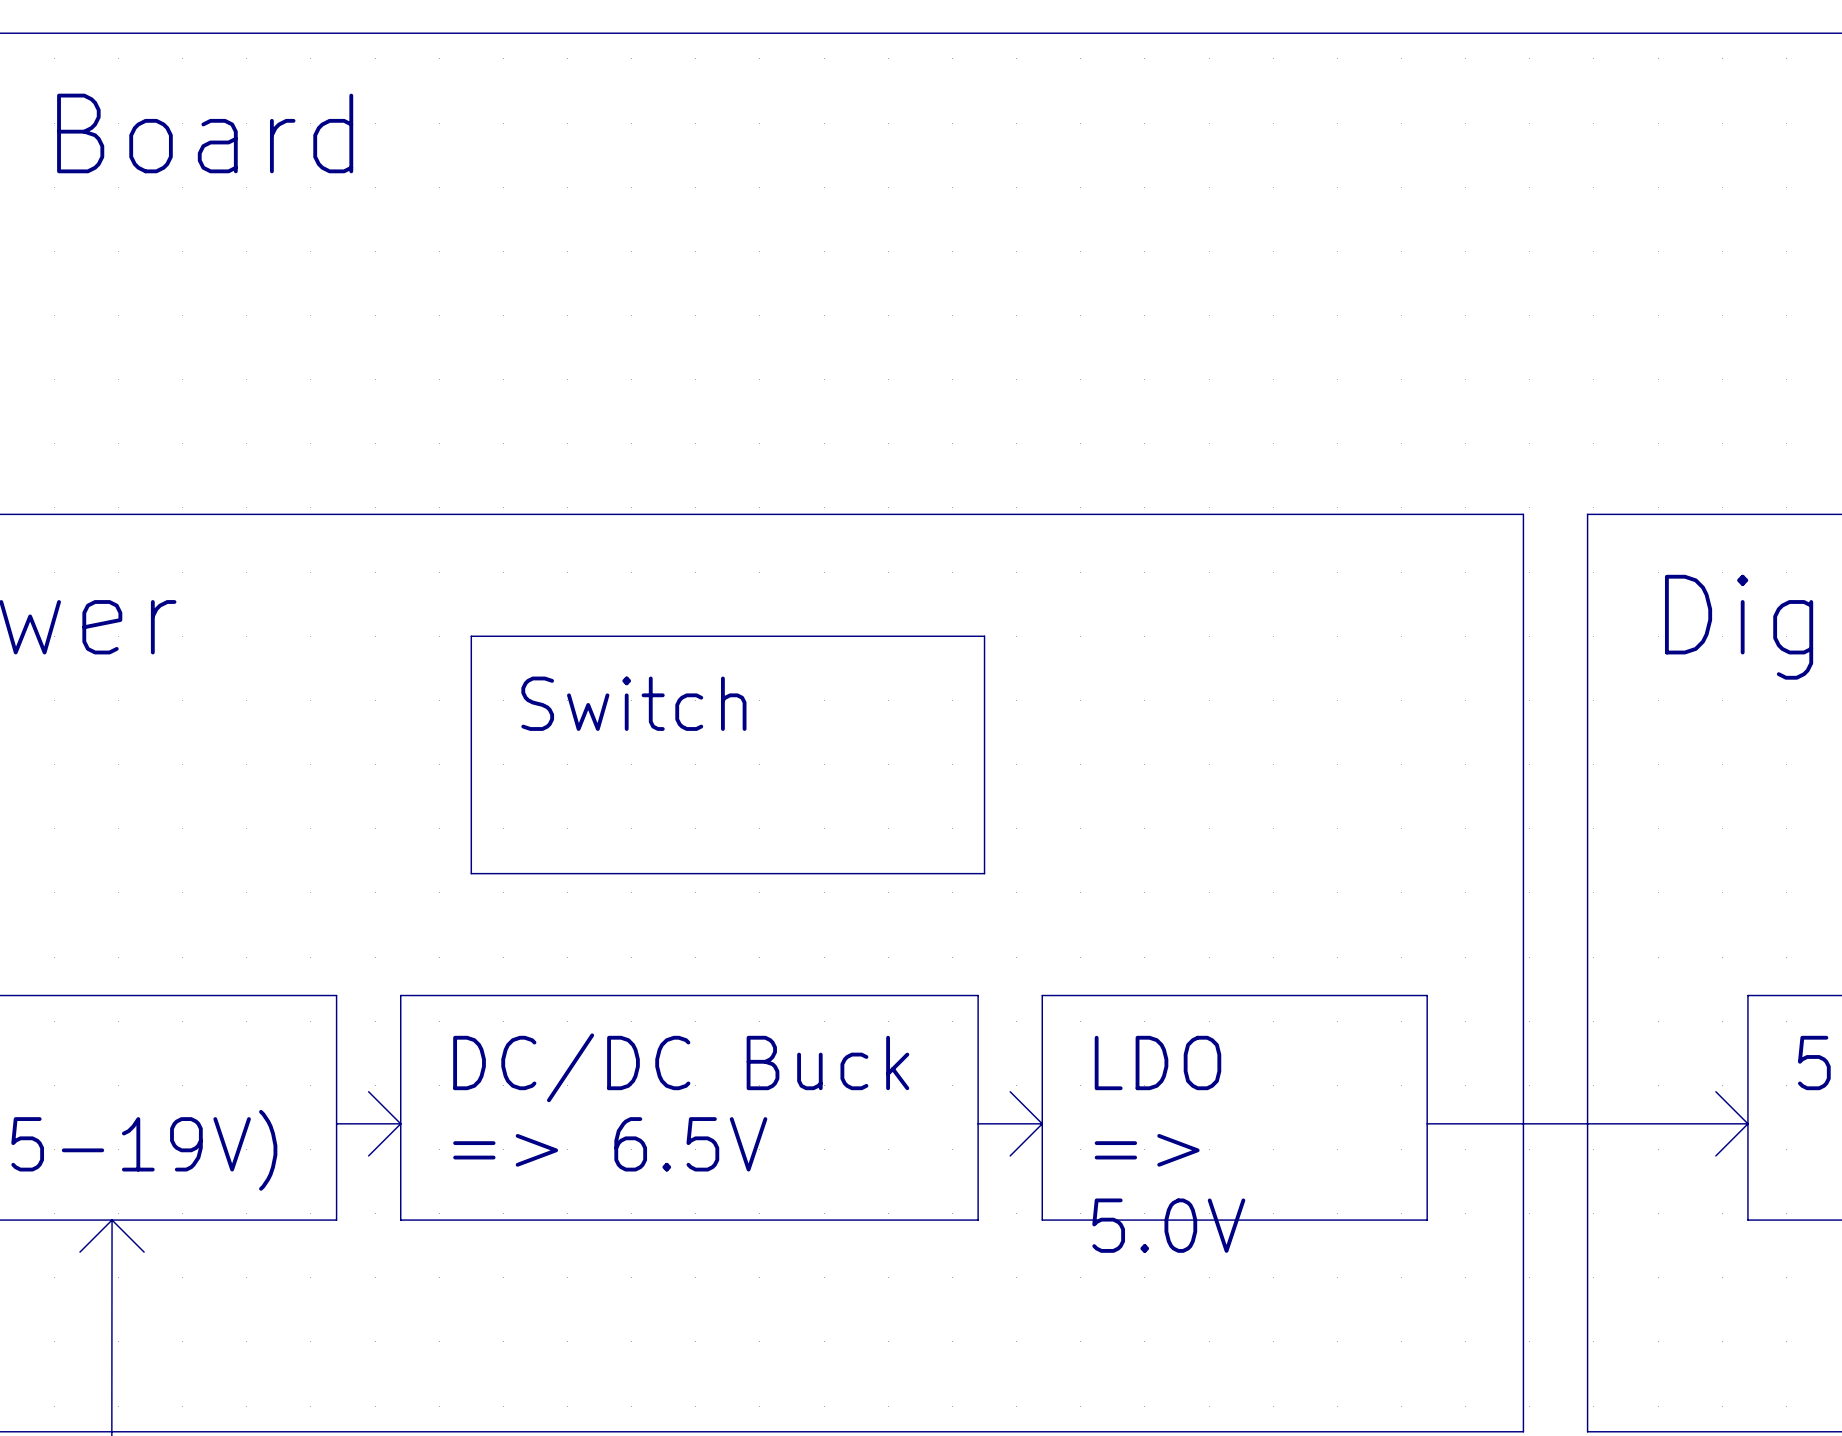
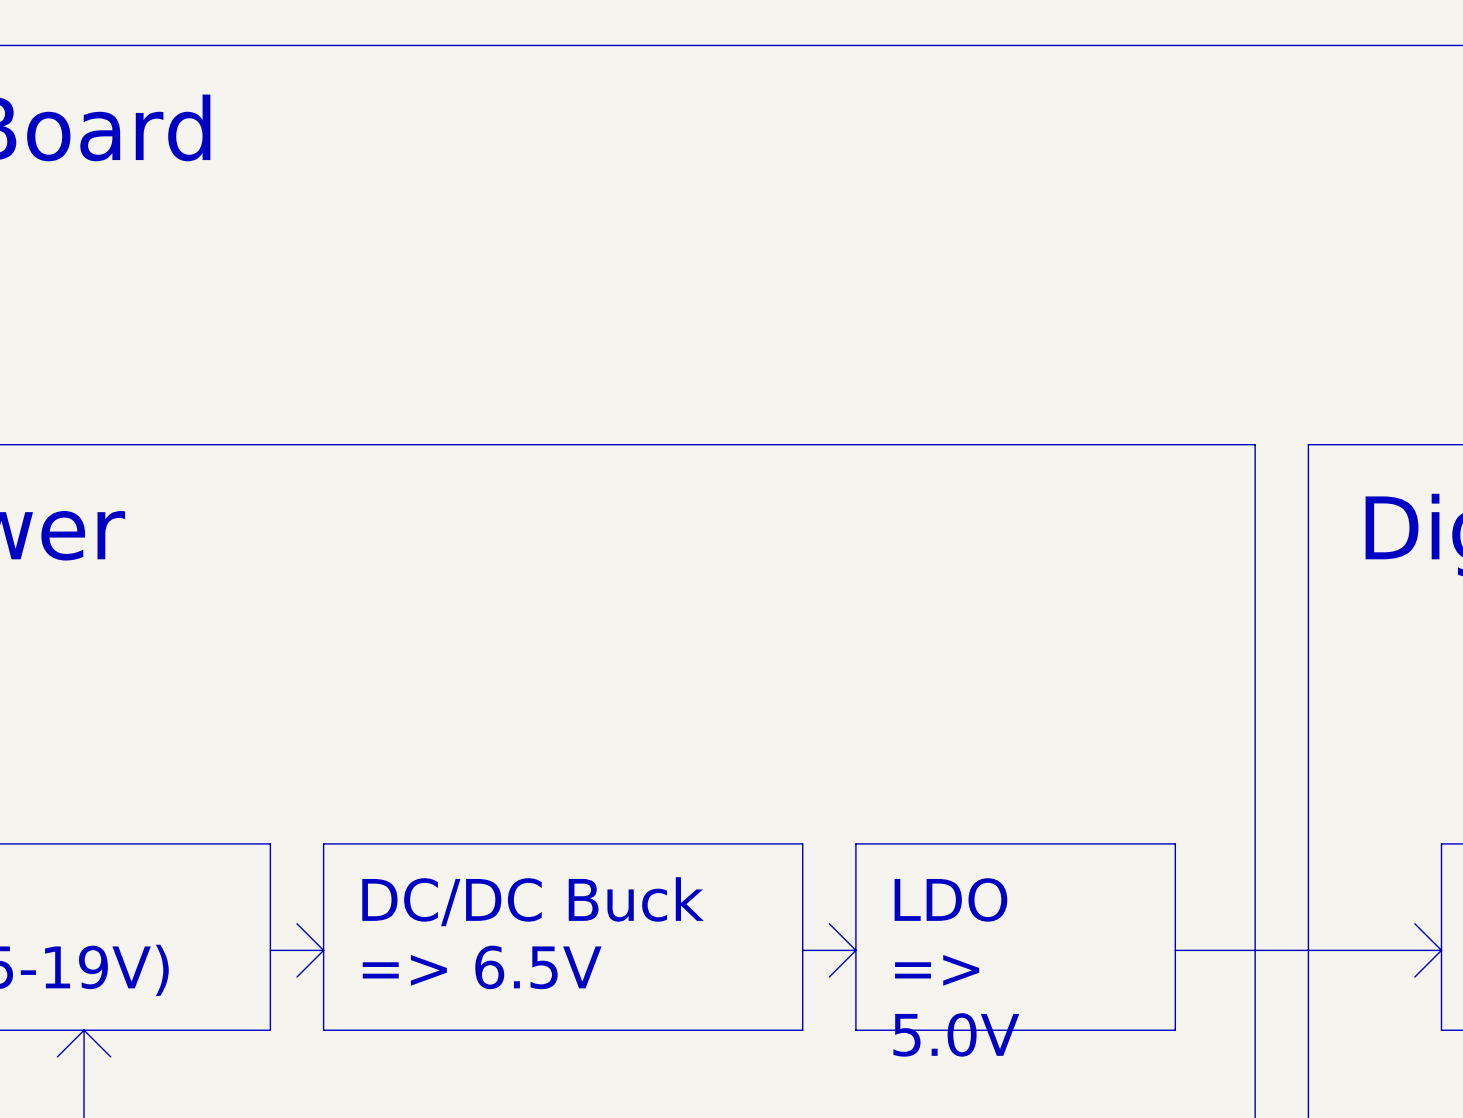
line: (471, 636) (984, 636) (984, 873) (471, 873) (471, 636) -> none
text: Switch (633, 703) -> none

